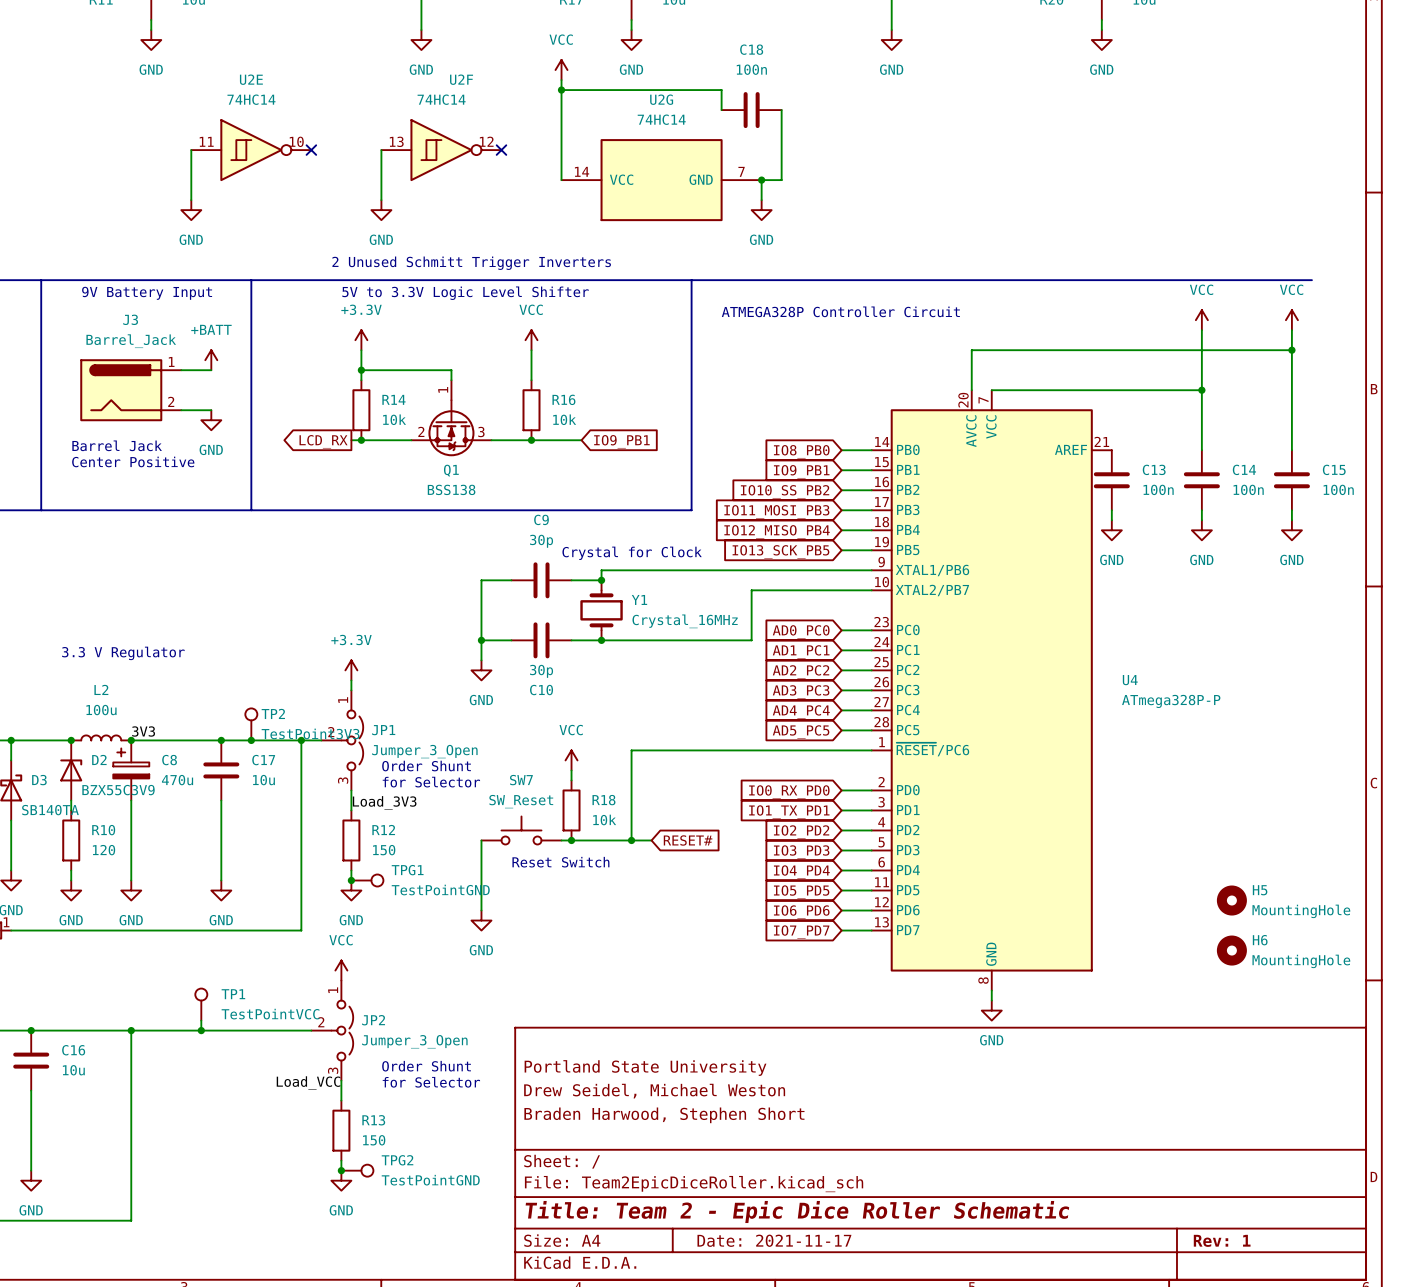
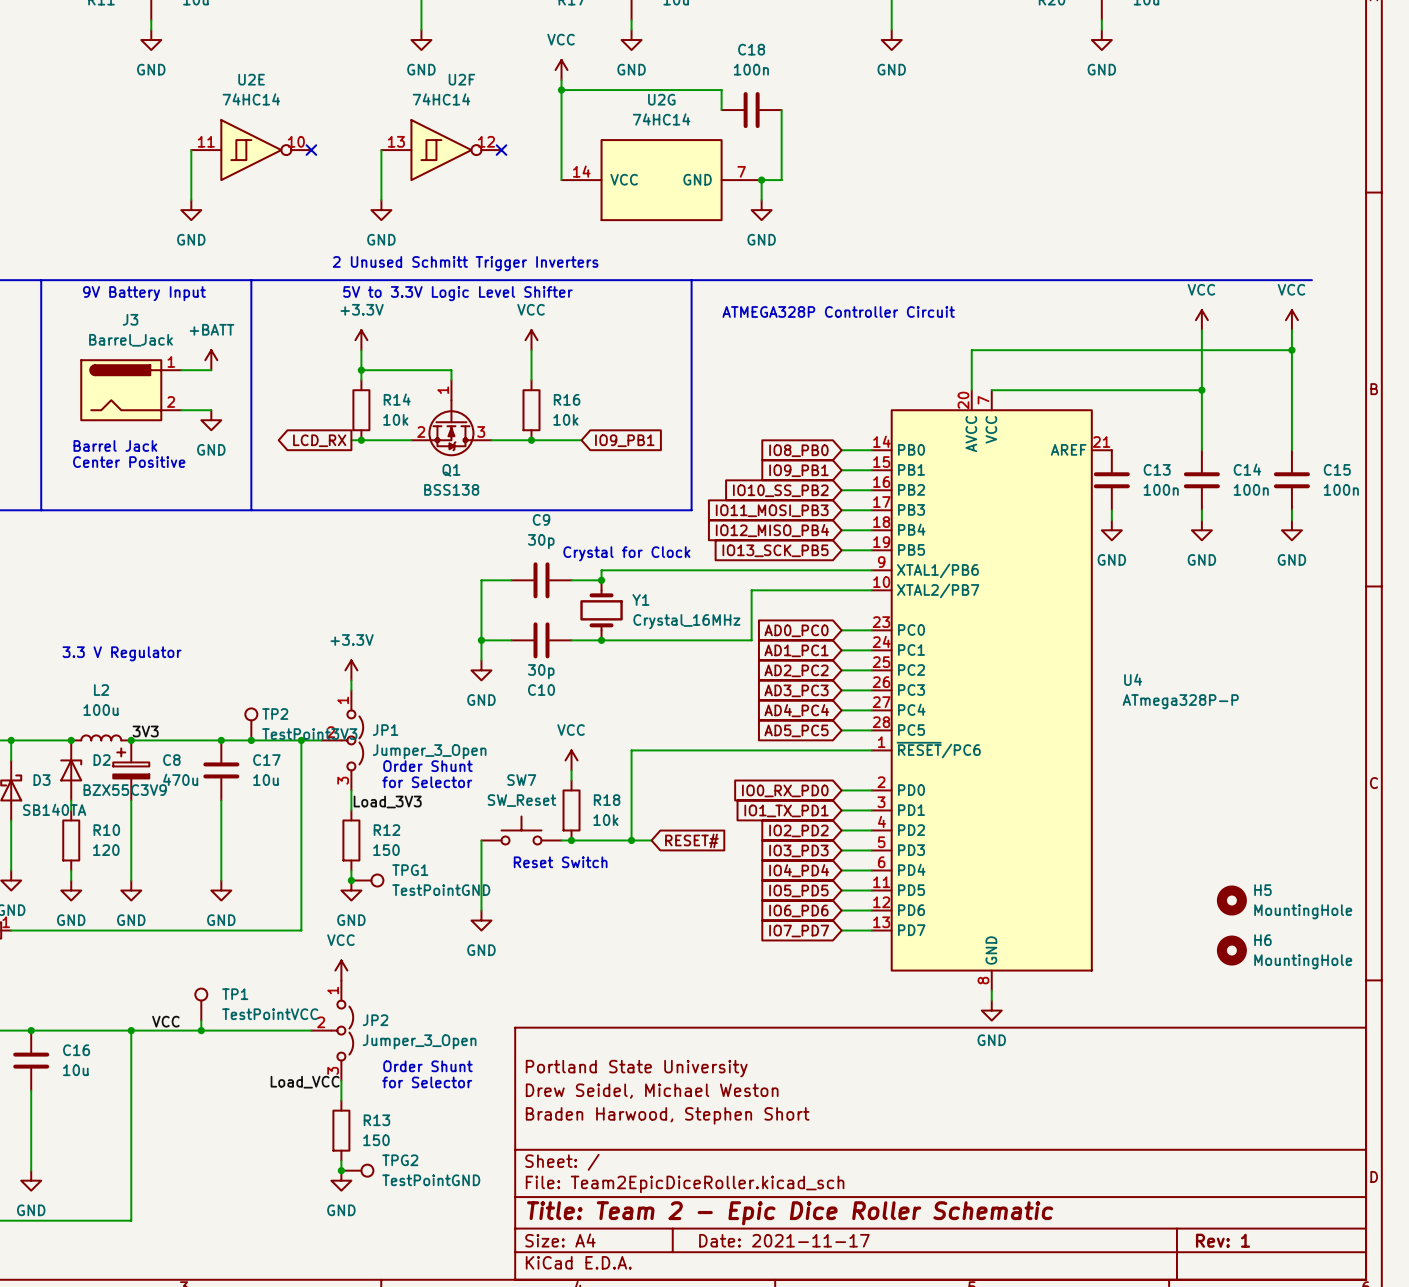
label: none -> VCC (165, 1021)

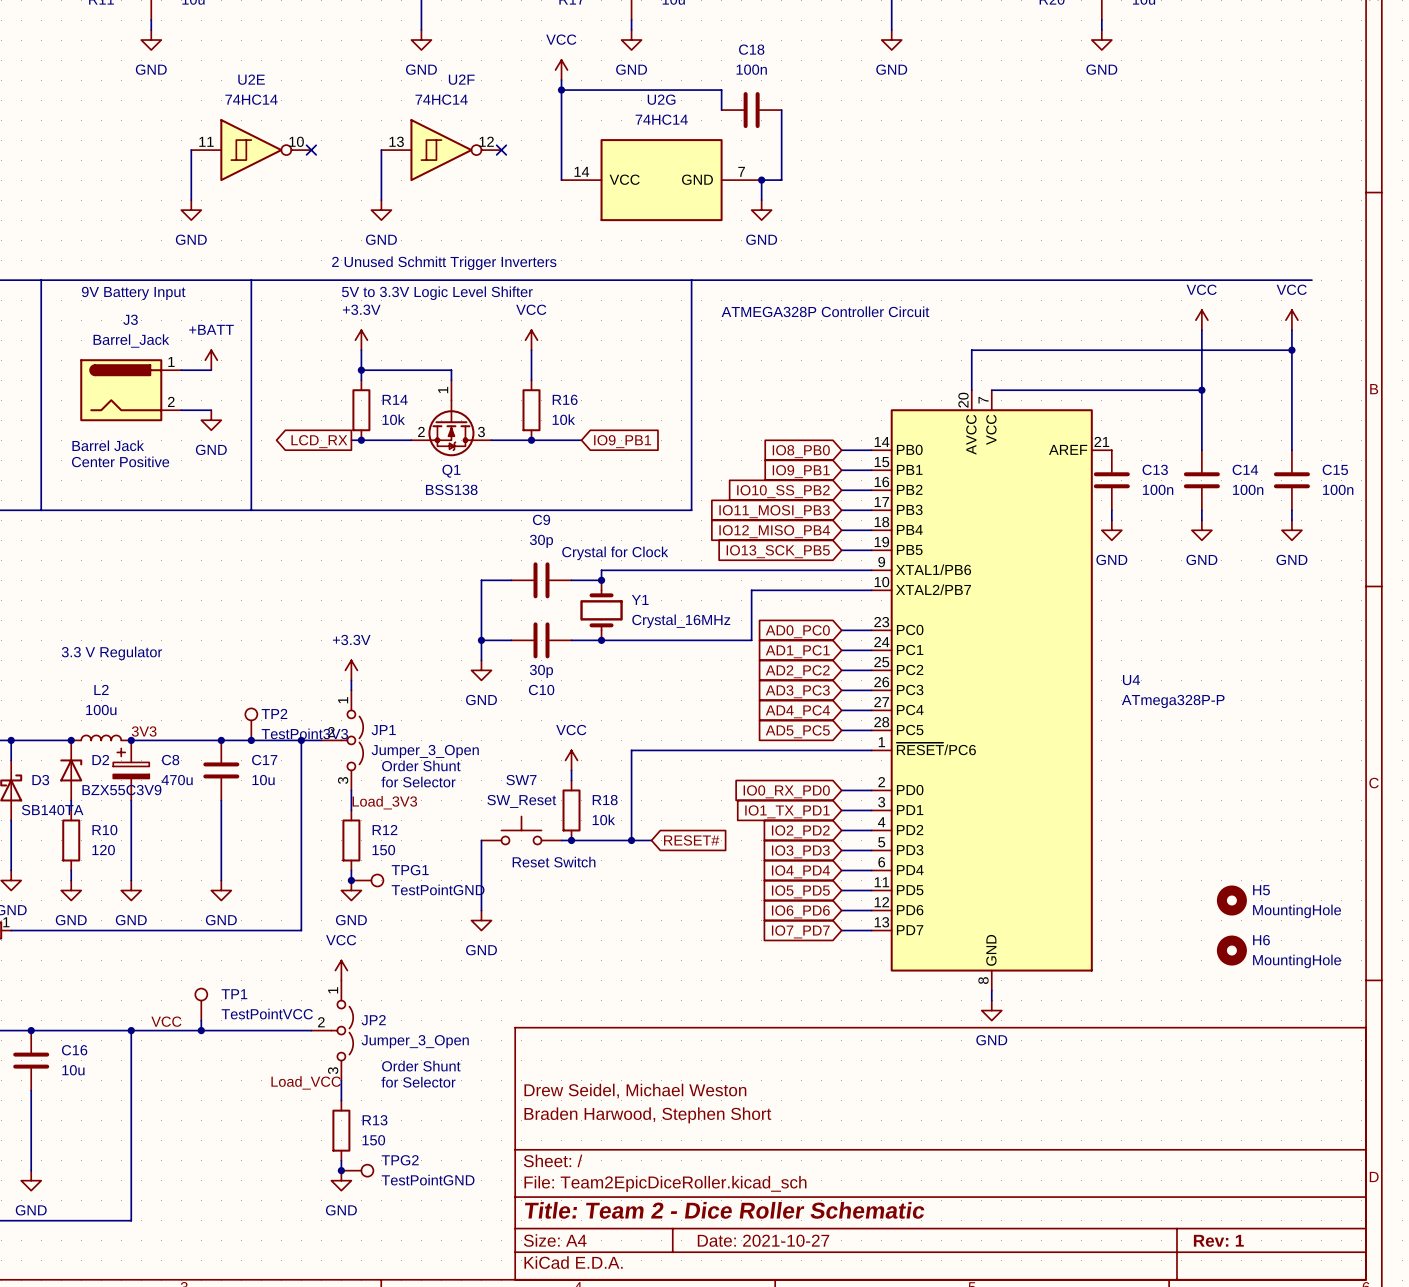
title block: Portland State University (636, 1068) -> none
title block: Title: Team 2 - Epic Dice Roller Schematic (790, 1213) -> Title: Team 2 - Dice Roller Schematic (724, 1210)
title block: Date: 2021-11-17 (784, 1240) -> Date: 2021-10-27 (763, 1240)

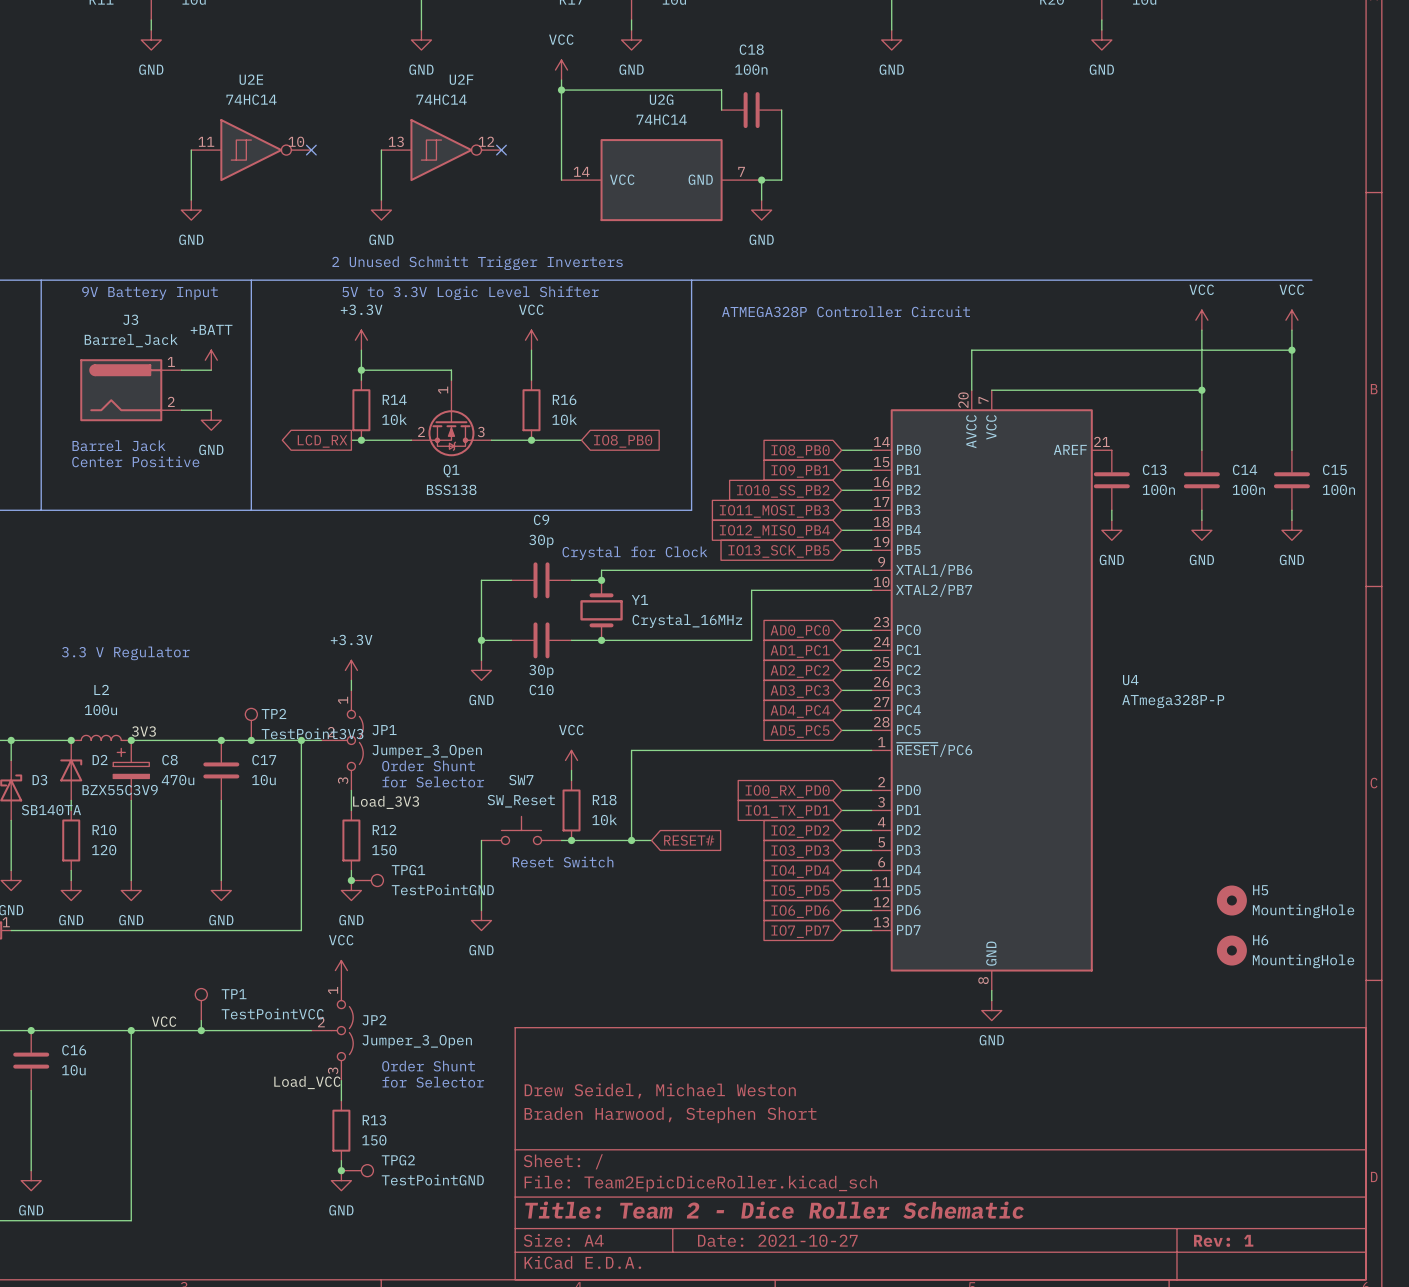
global label: IO9_PB1 (622, 441) -> IO8_PB0 (623, 441)

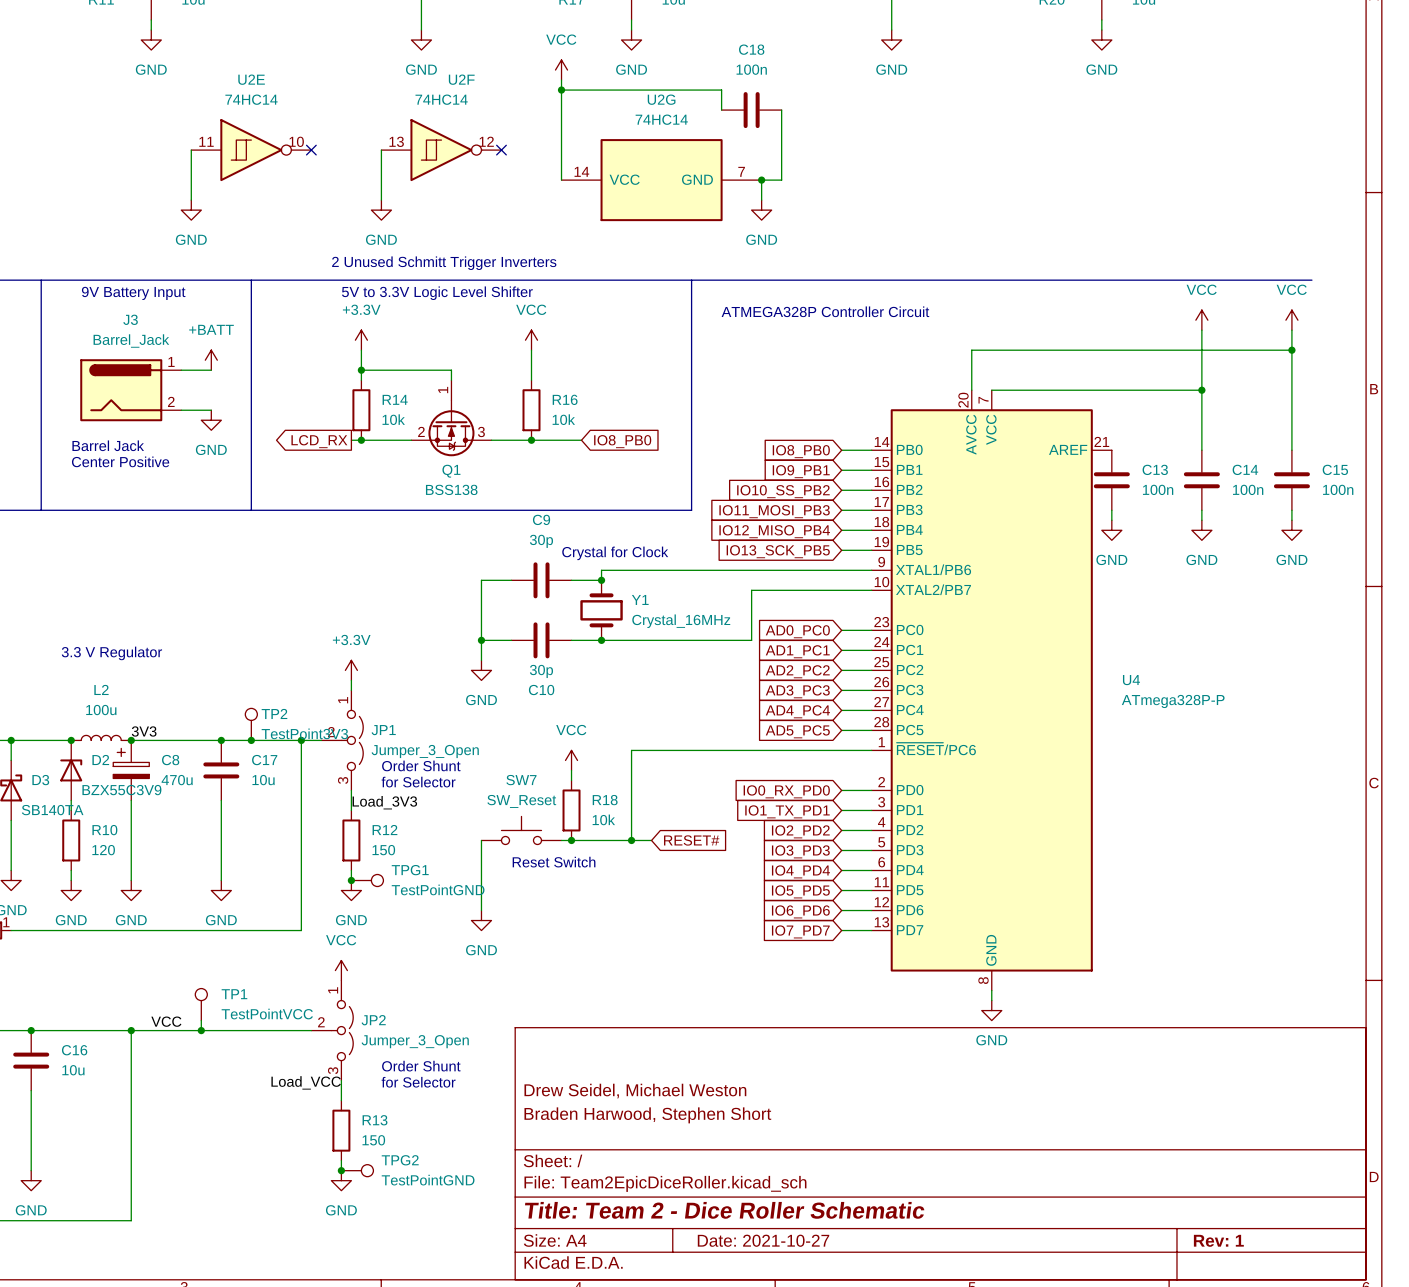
H5: MountingHole (1231, 900) -> none
H6: MountingHole (1231, 950) -> none

